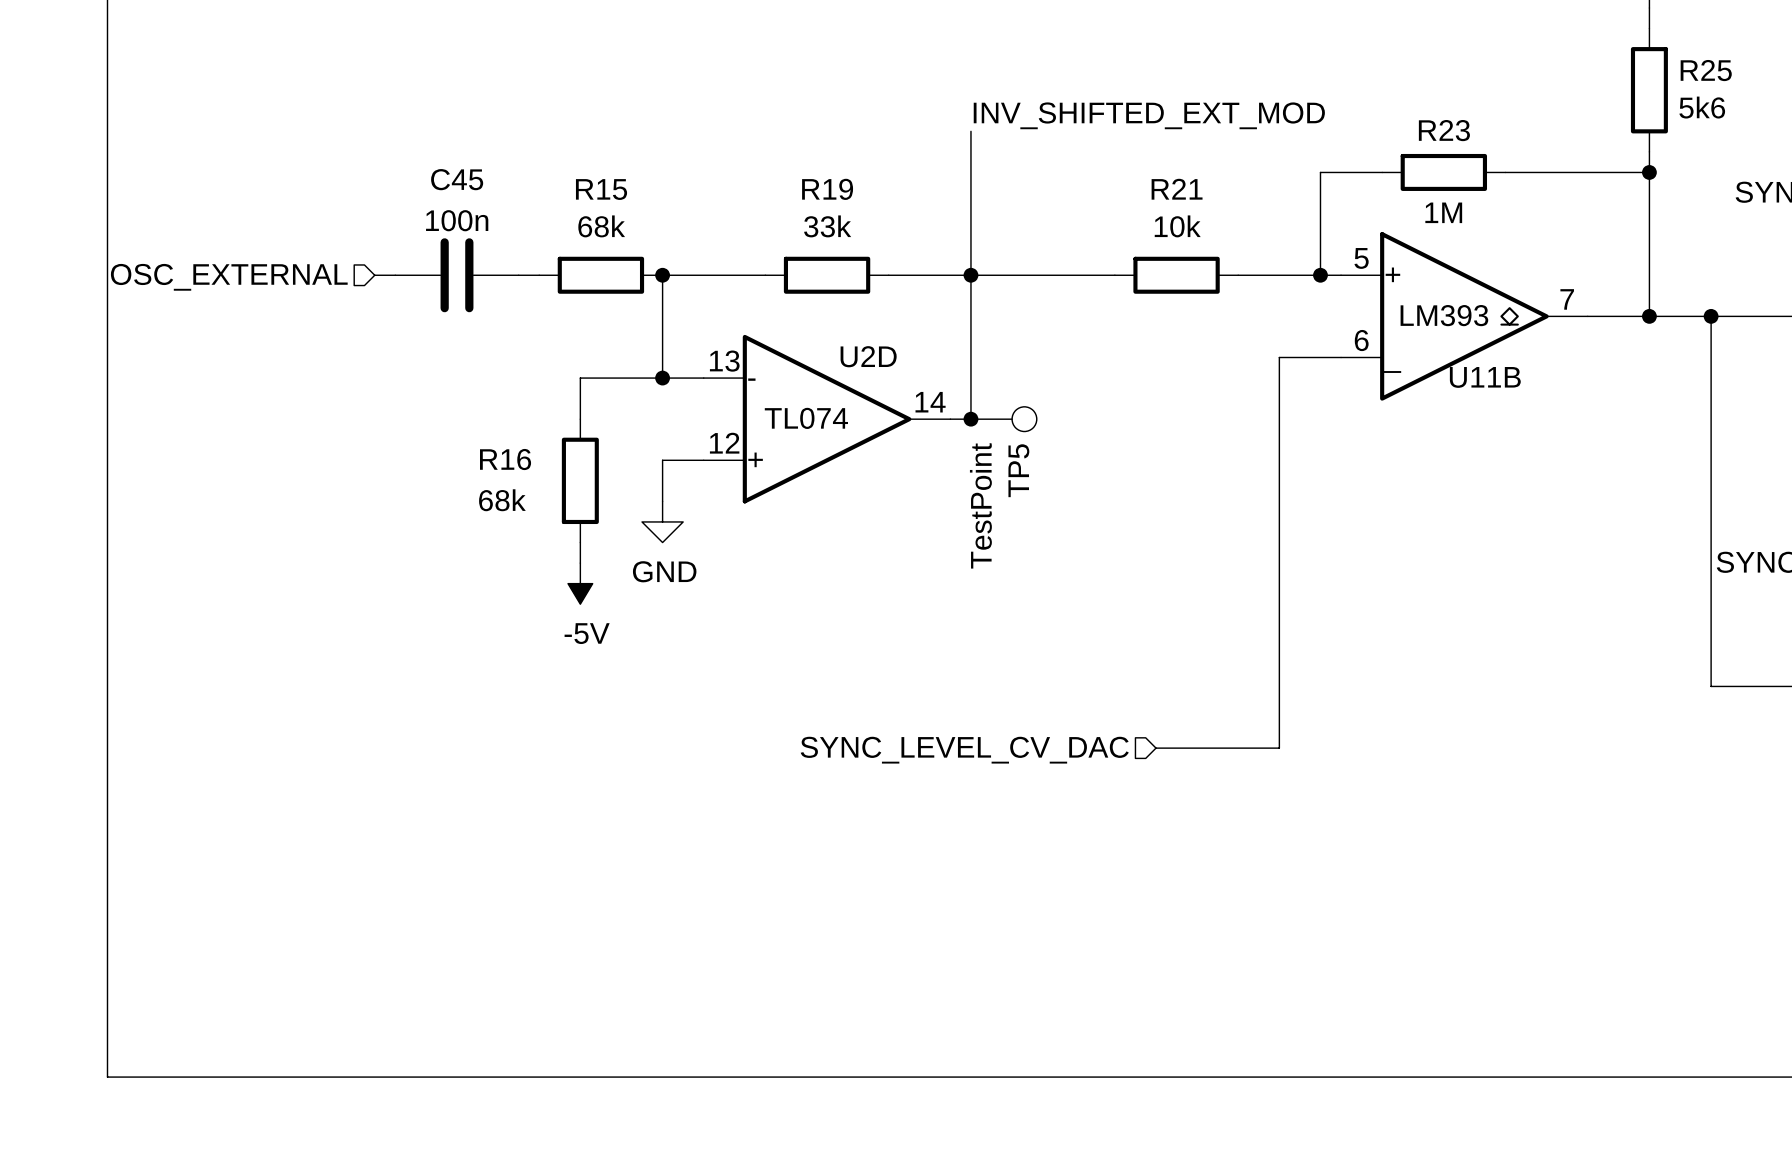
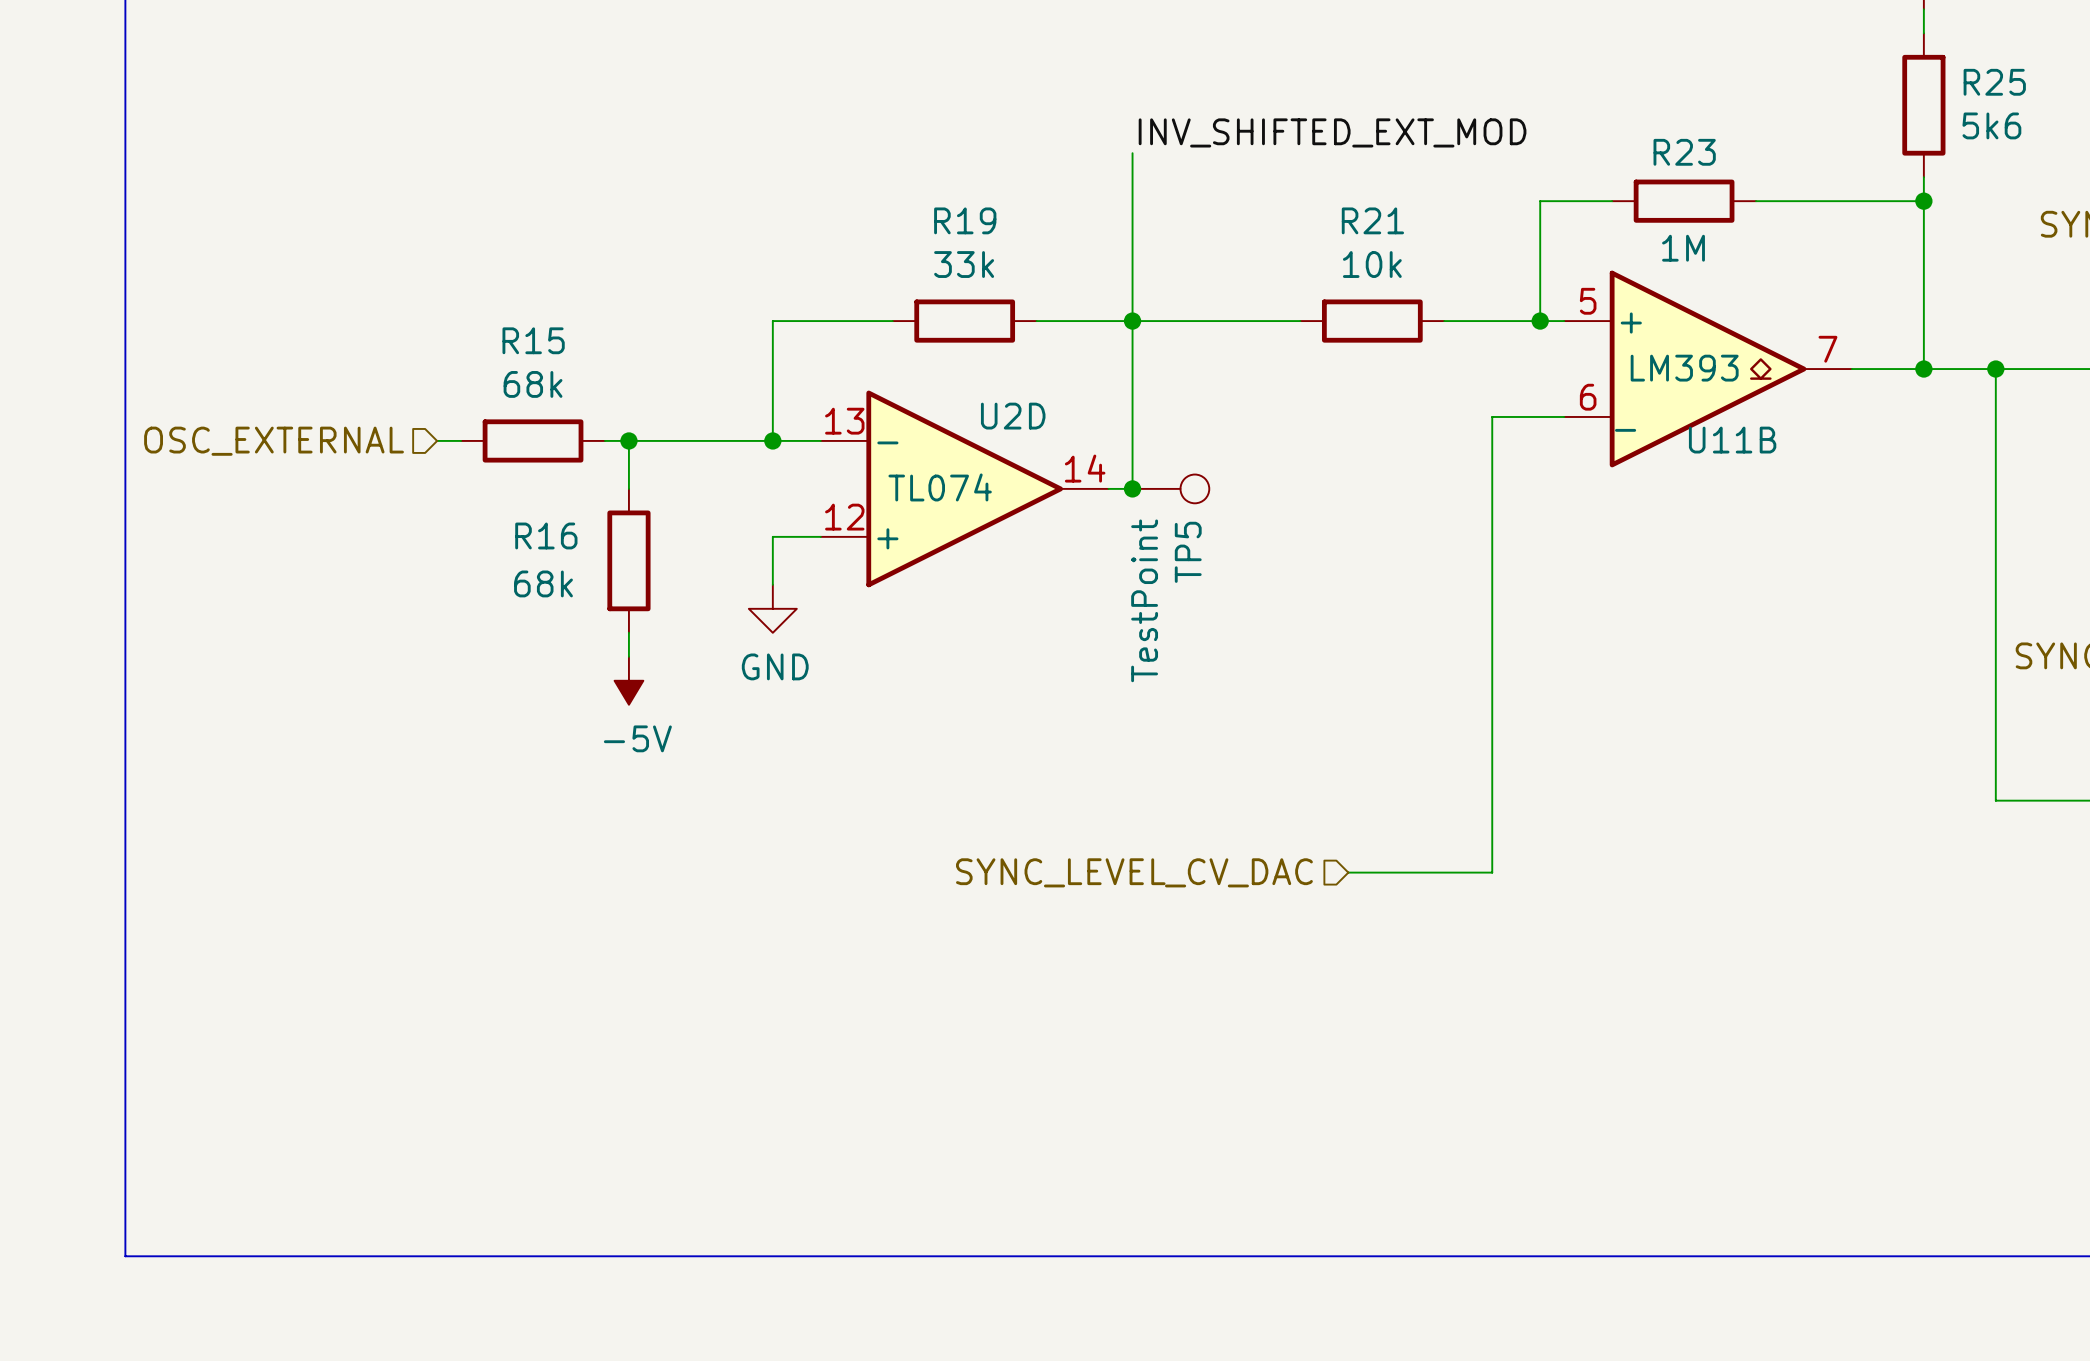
wire: (374, 275) (395, 275) -> (437, 440) (461, 440)
C45: 100n (457, 275) -> none
wire: (518, 275) (539, 275) -> none
R15 position: (600, 275) -> (533, 440)
junction: (662, 275) -> none
hierarchical label position: OSC_EXTERNAL (229, 277) -> OSC_EXTERNAL (274, 441)
wire: none -> (628, 440) (628, 488)
junction: none -> (628, 440)
wire: (580, 378) (580, 419) -> (676, 440) (604, 440)
R16 position: (580, 480) -> (628, 560)
wire: (580, 542) (580, 563) -> (628, 632) (628, 656)
power symbol position: -5V (580, 583) -> -5V (628, 680)

